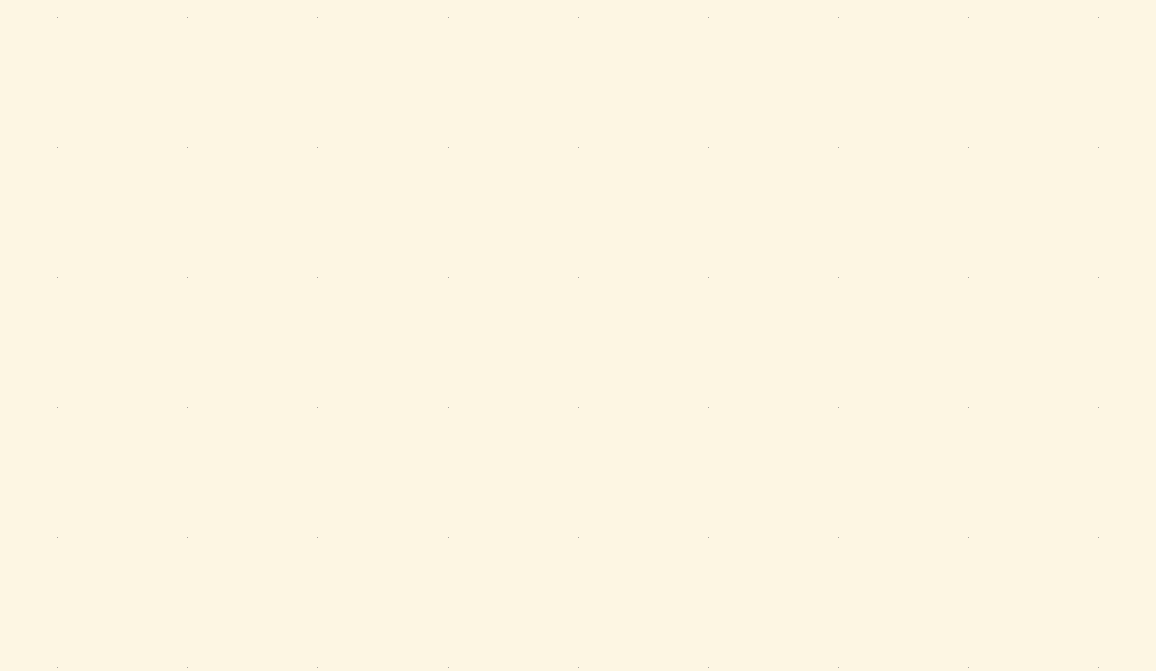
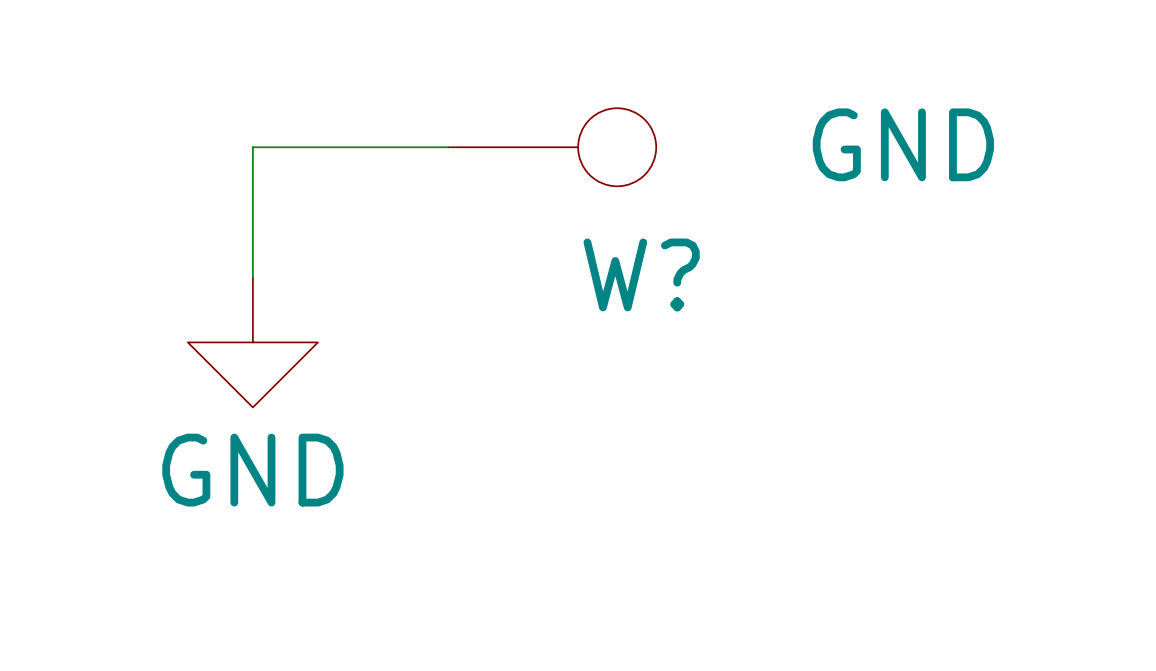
wire: none -> (448, 147) (252, 147) (252, 277)
W?: none -> GND (552, 147)
power symbol: none -> GND (252, 342)

